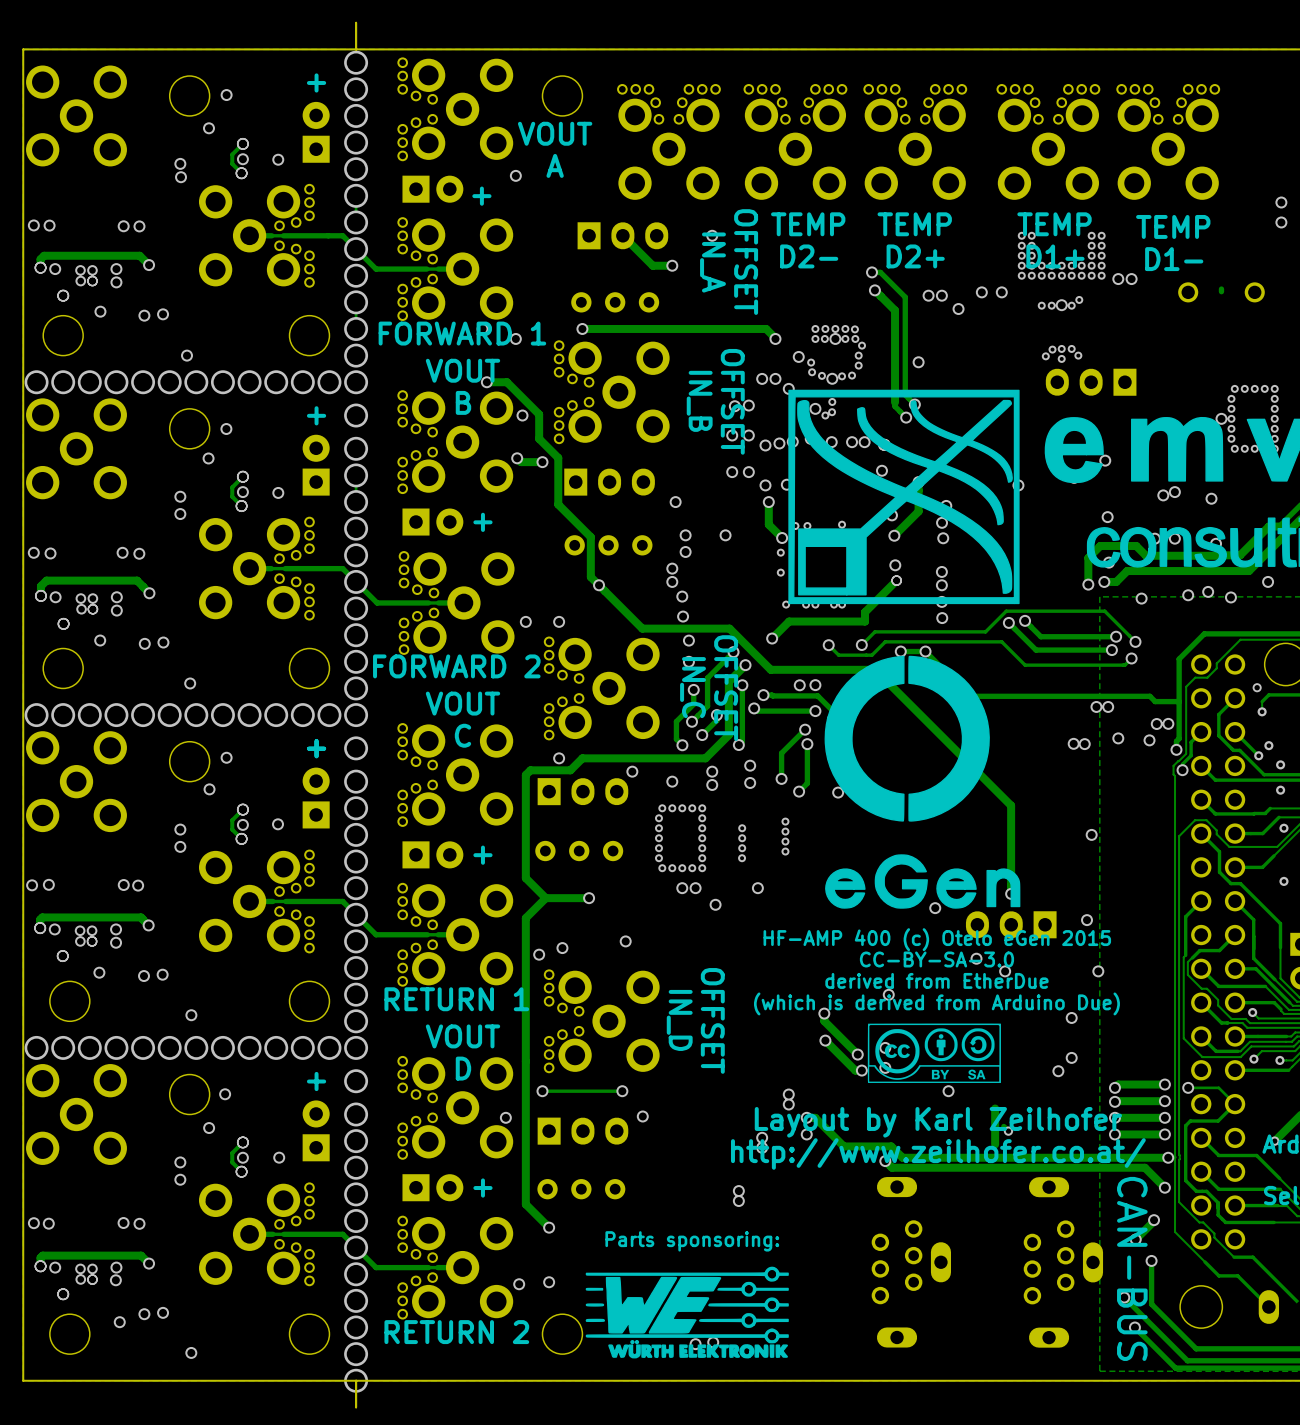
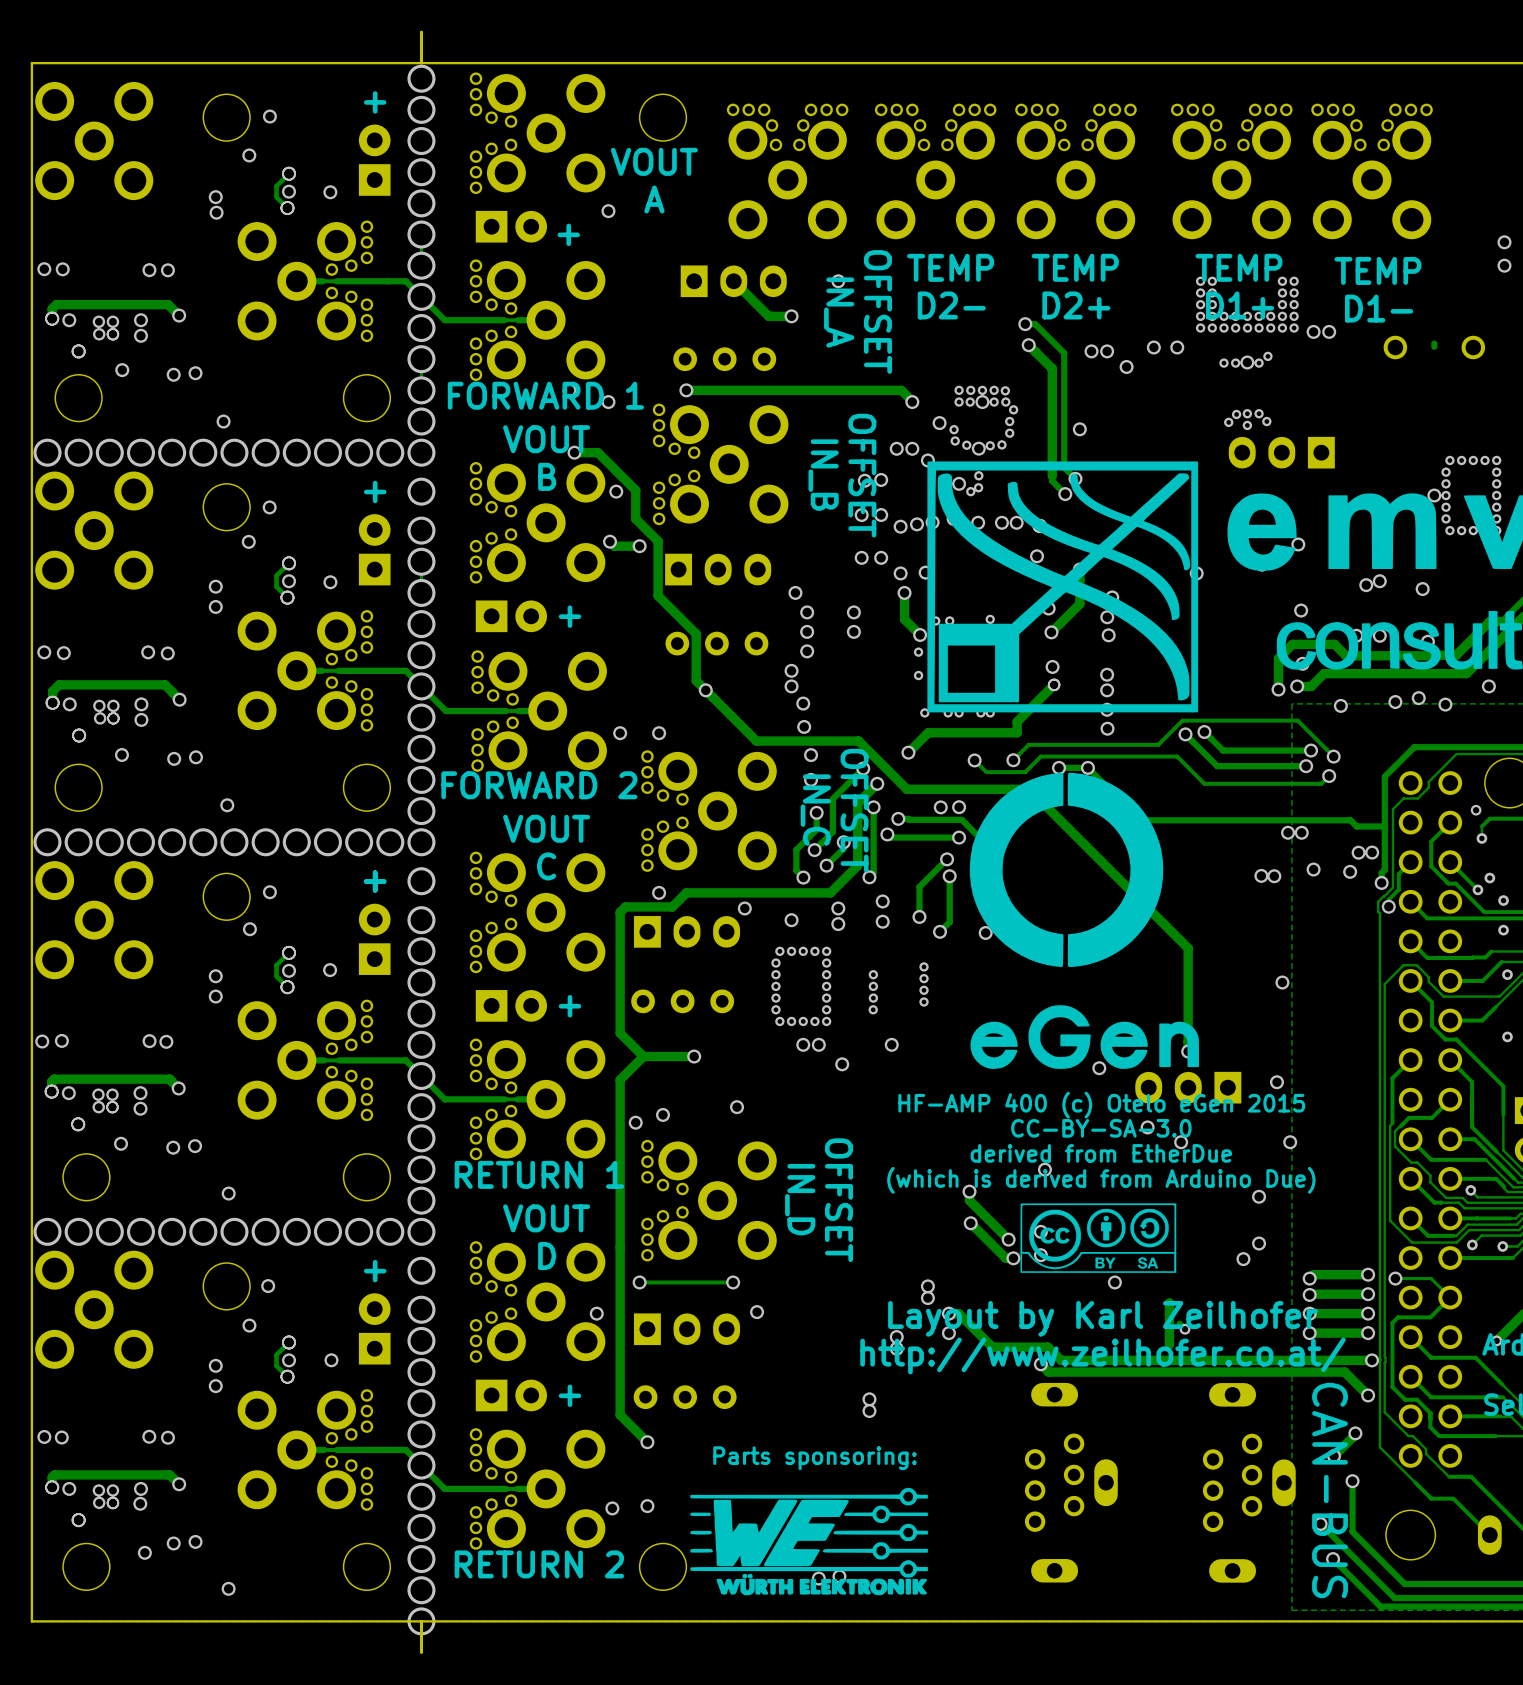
via: none -> (807, 612)
via: none -> (853, 612)

